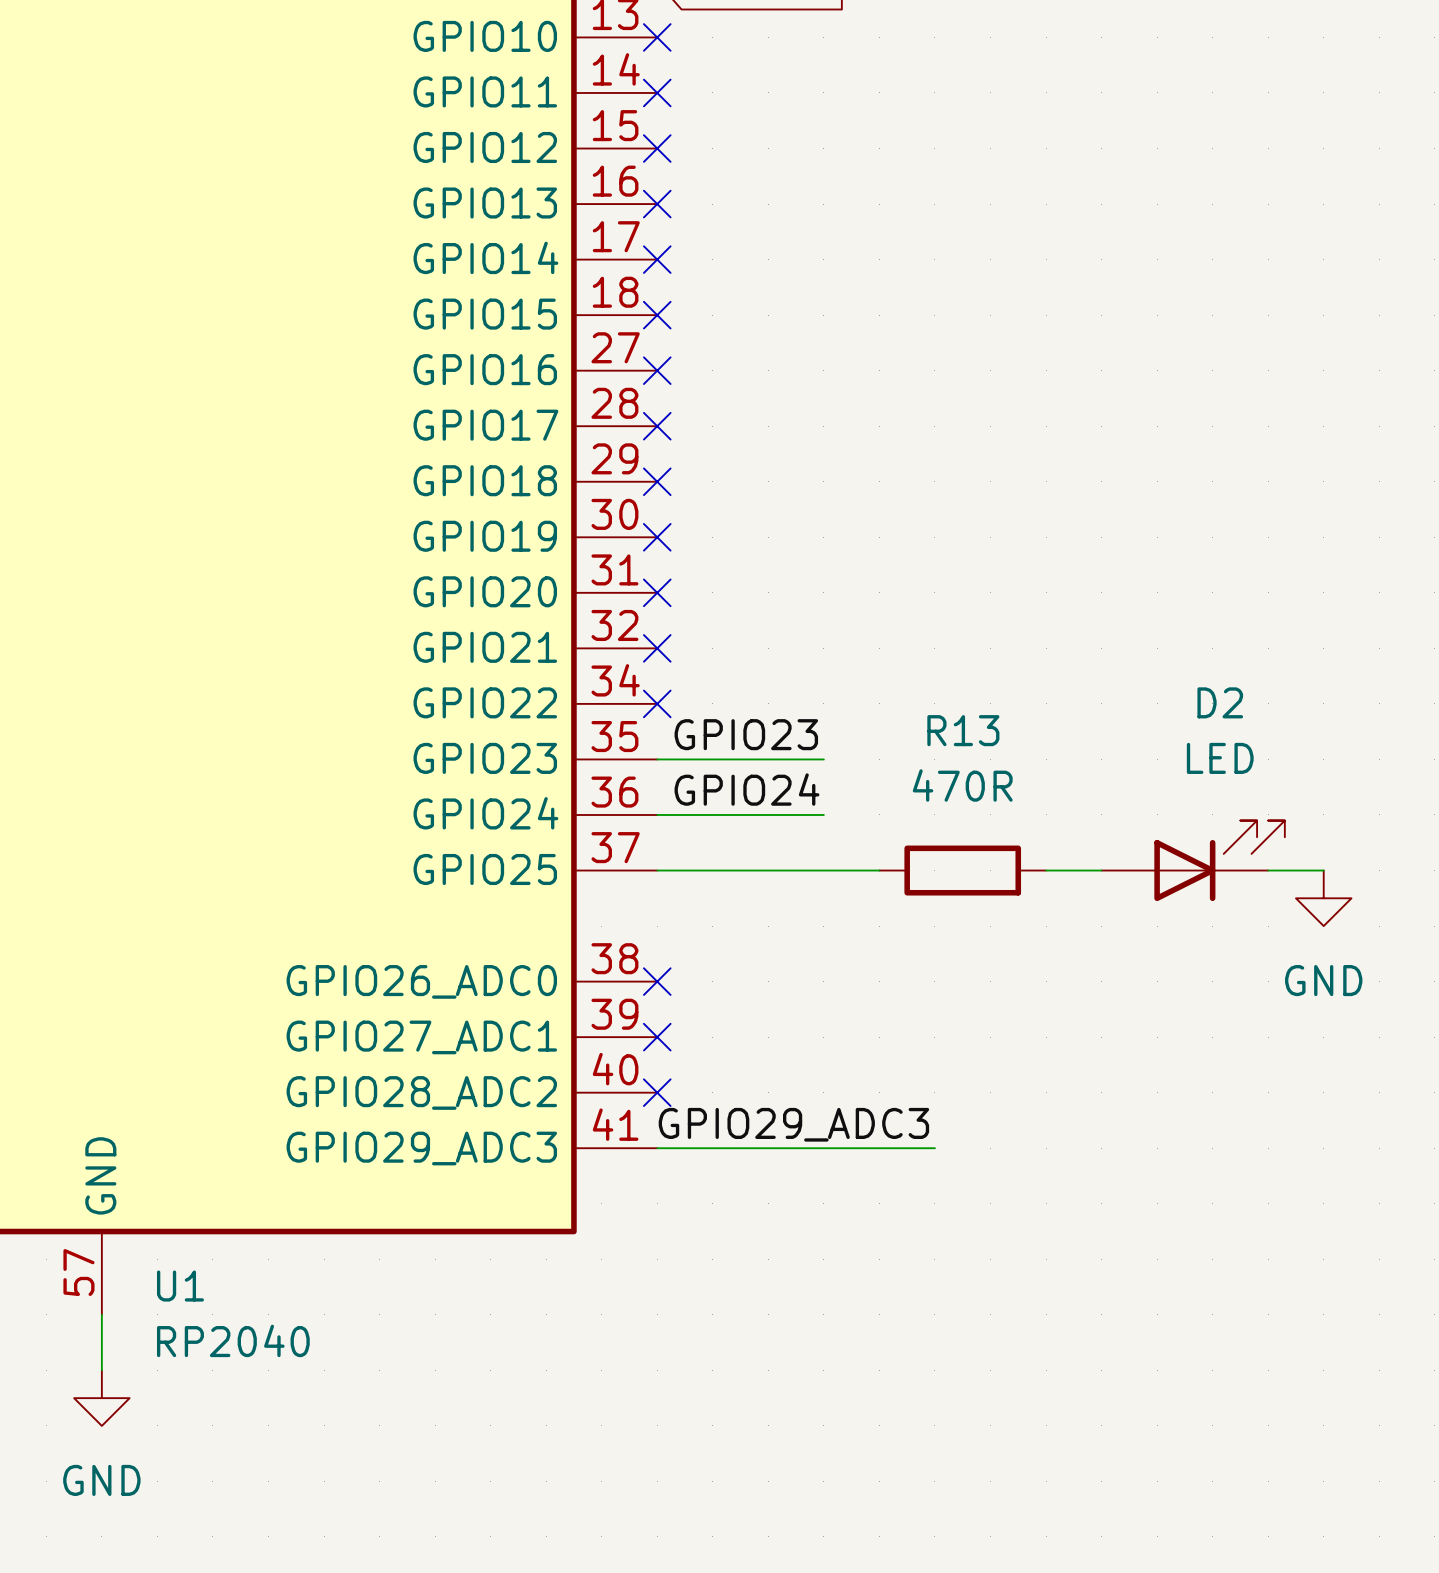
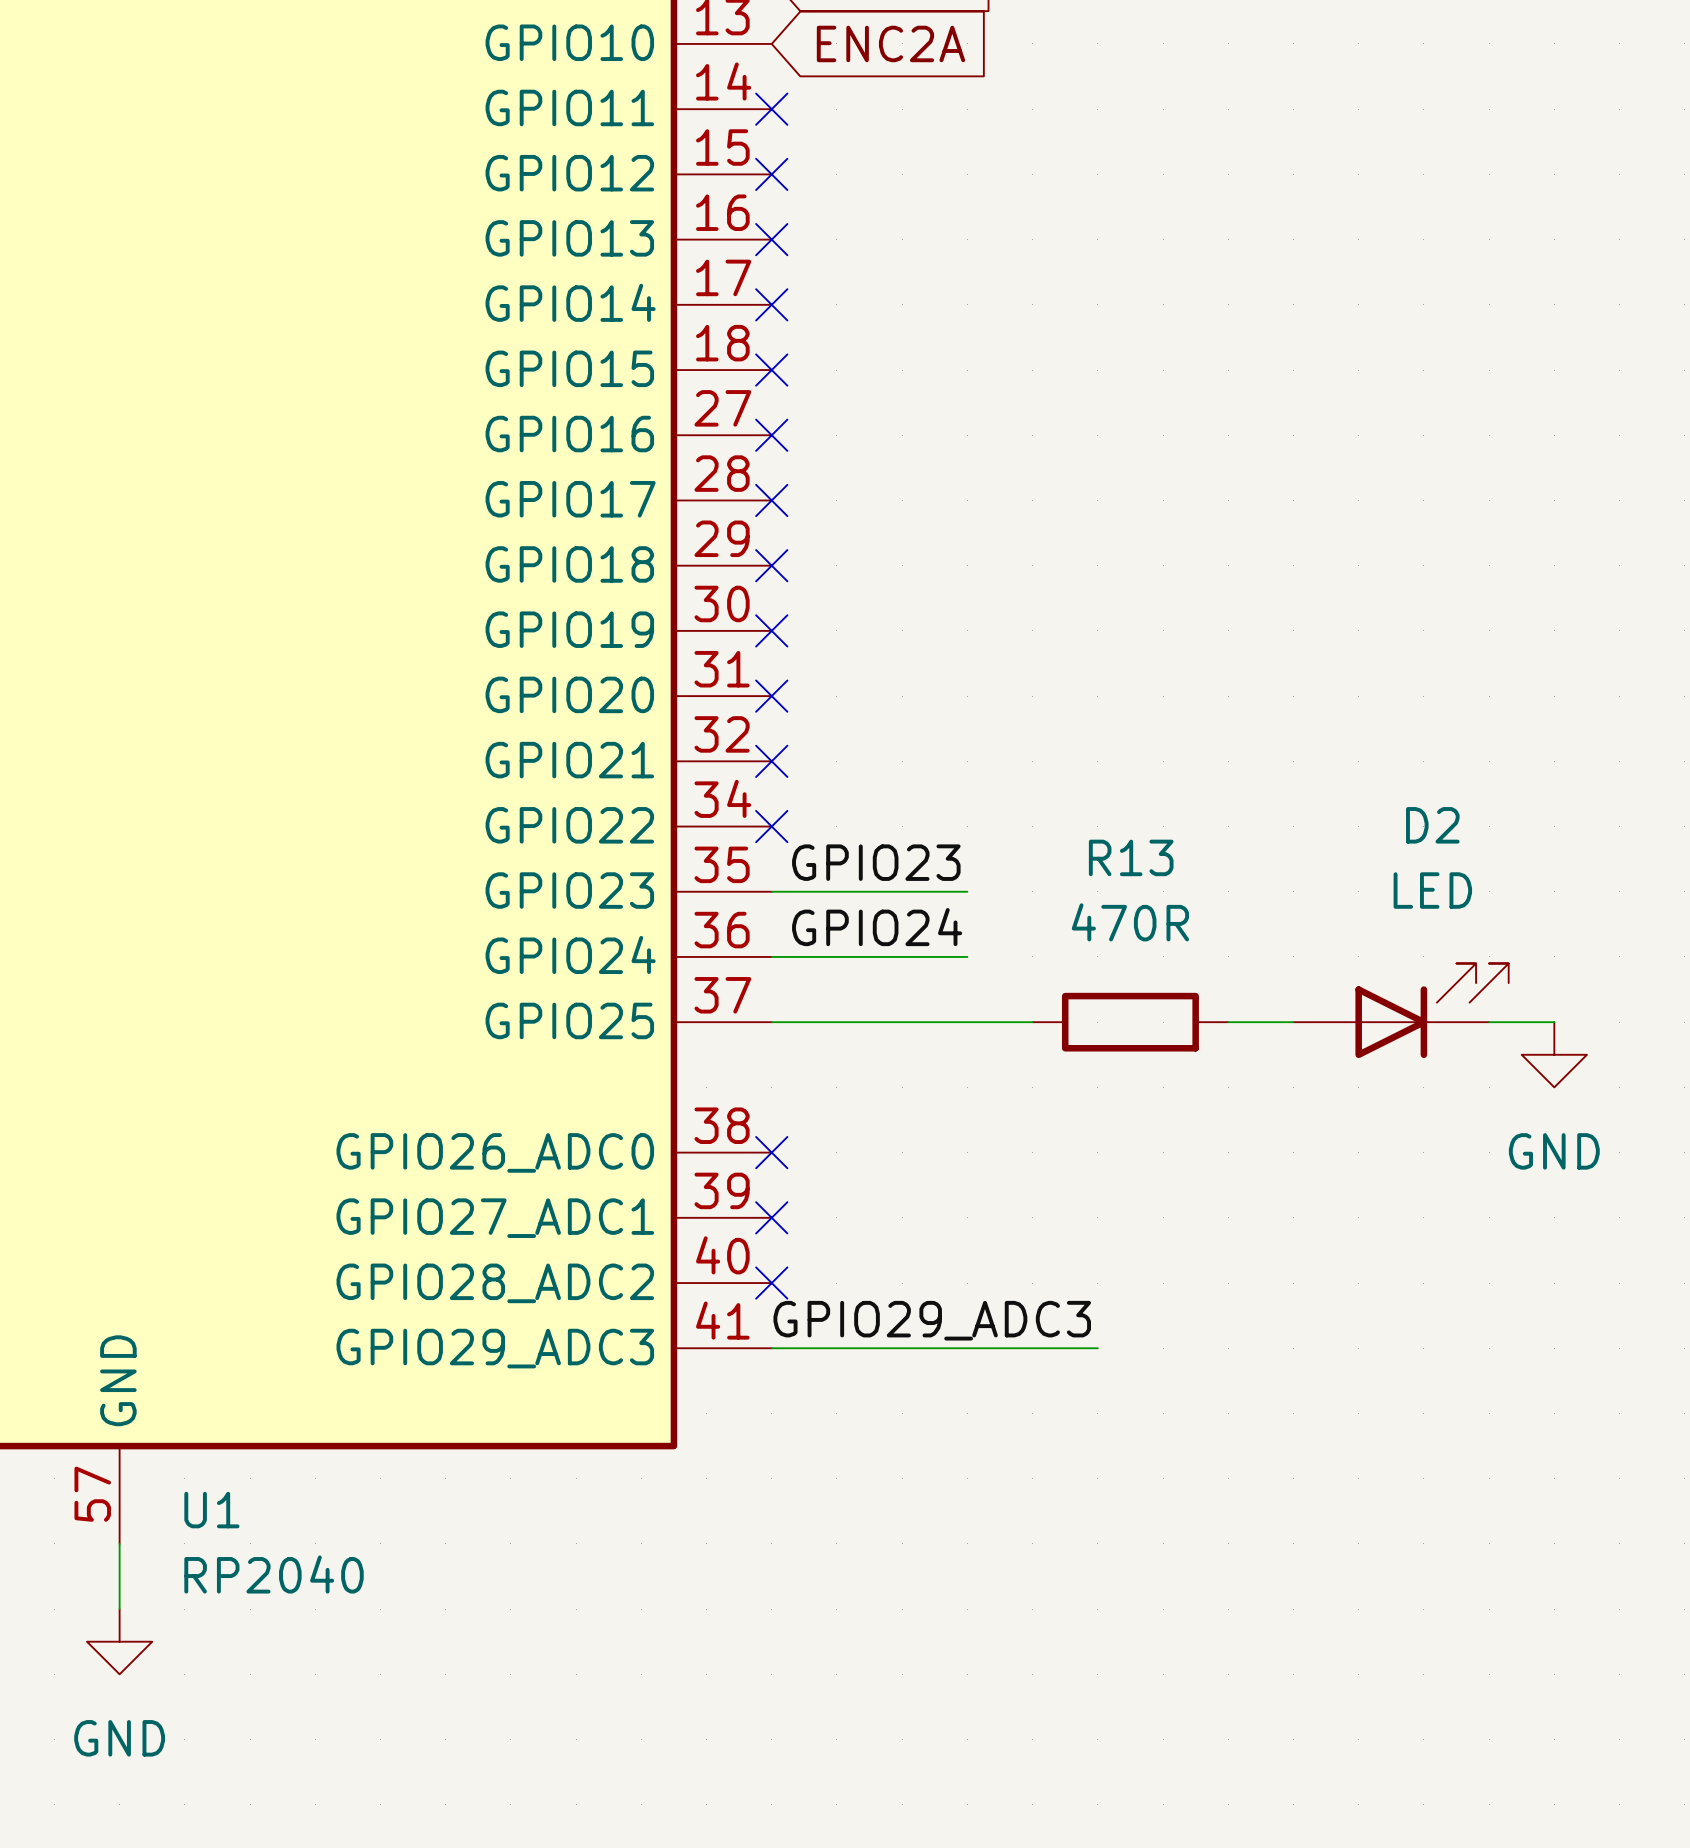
no-connect mark: (657, 37) -> none
global label: none -> ENC2A (890, 43)

